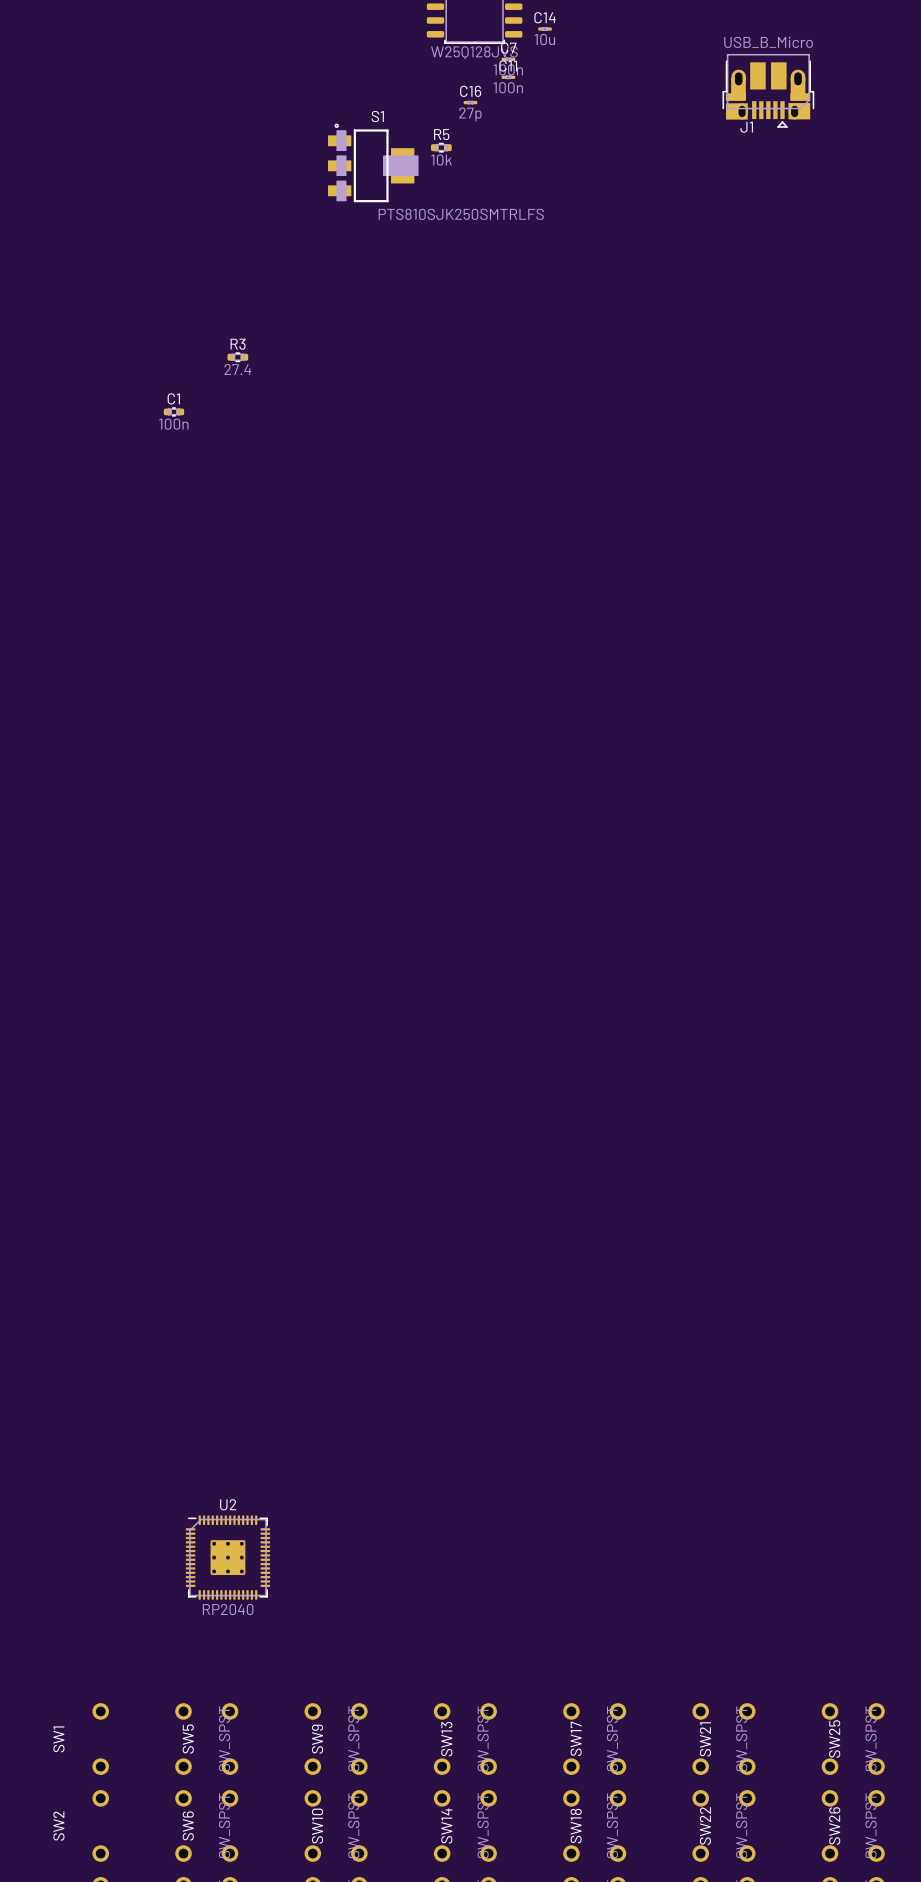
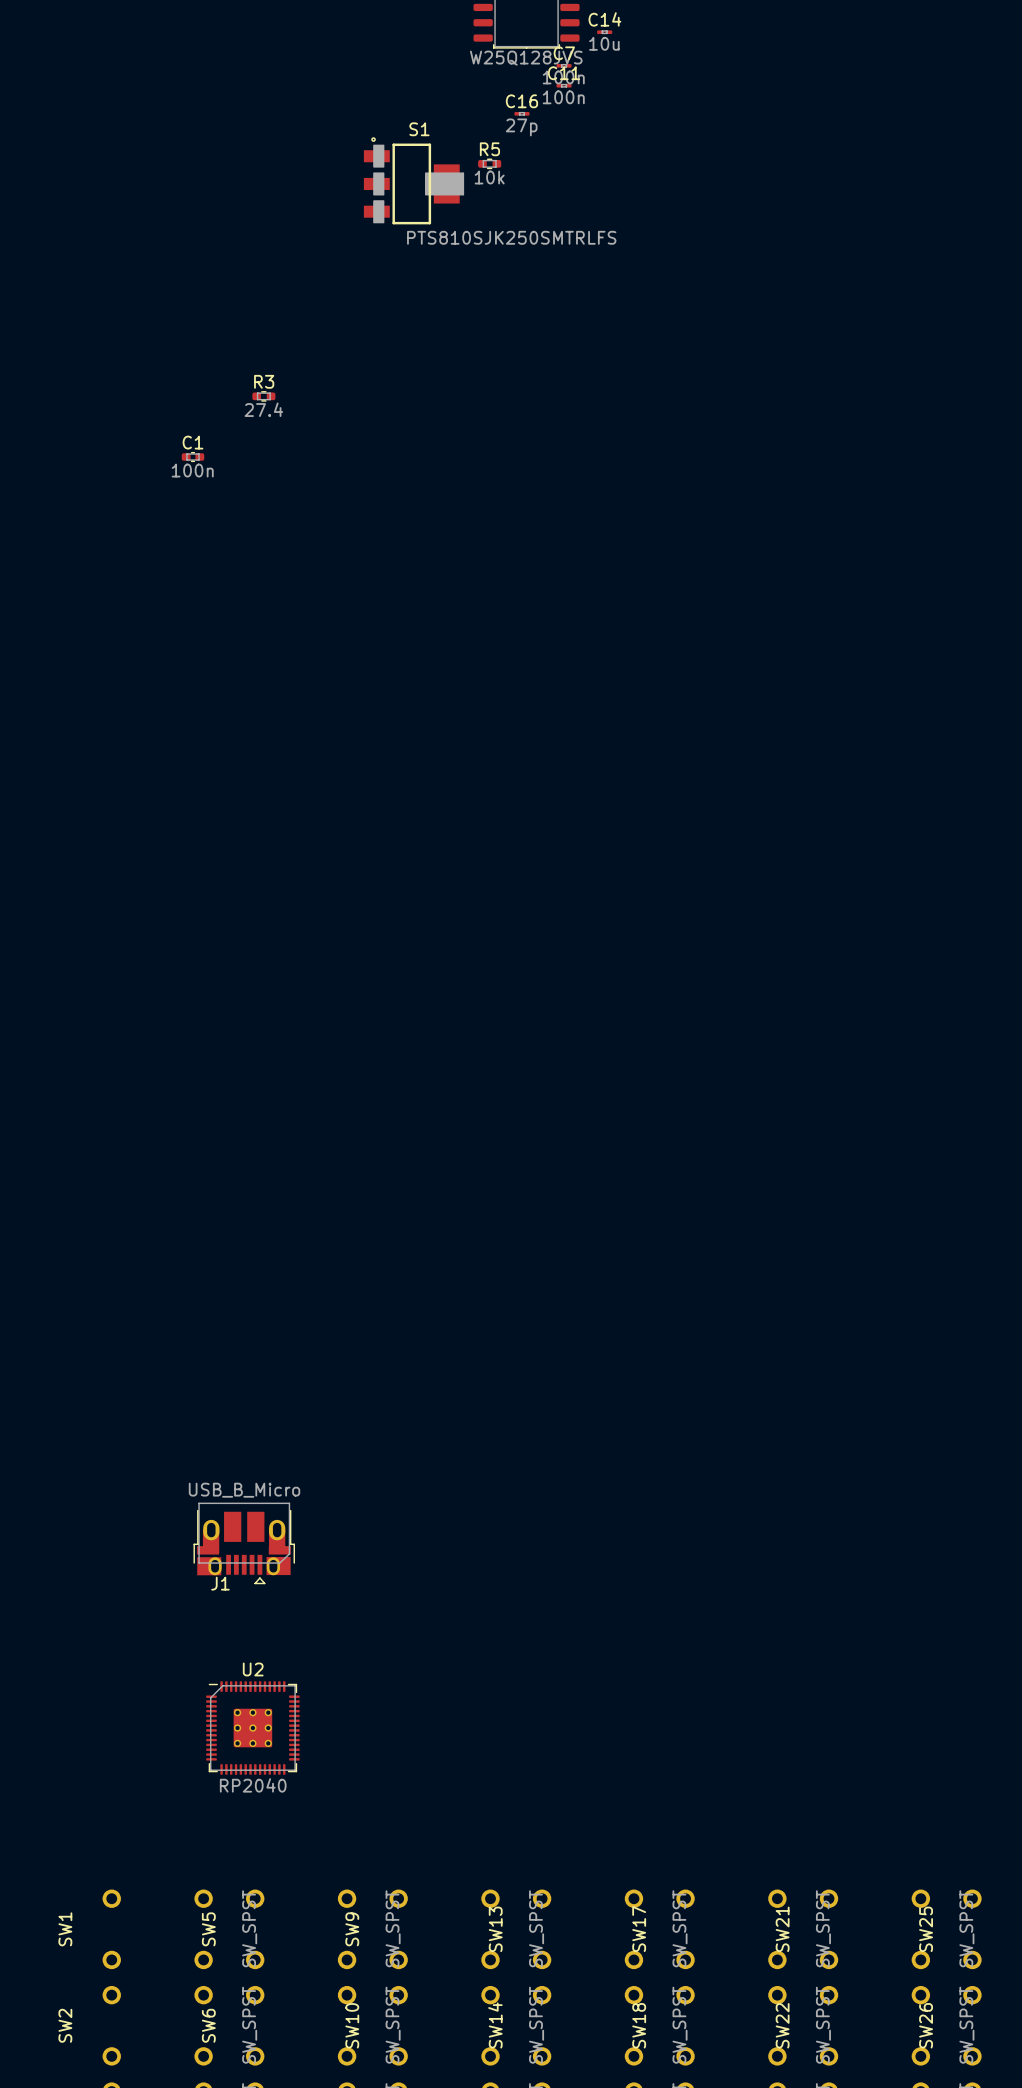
J1 position: (768, 90) -> (244, 1543)

